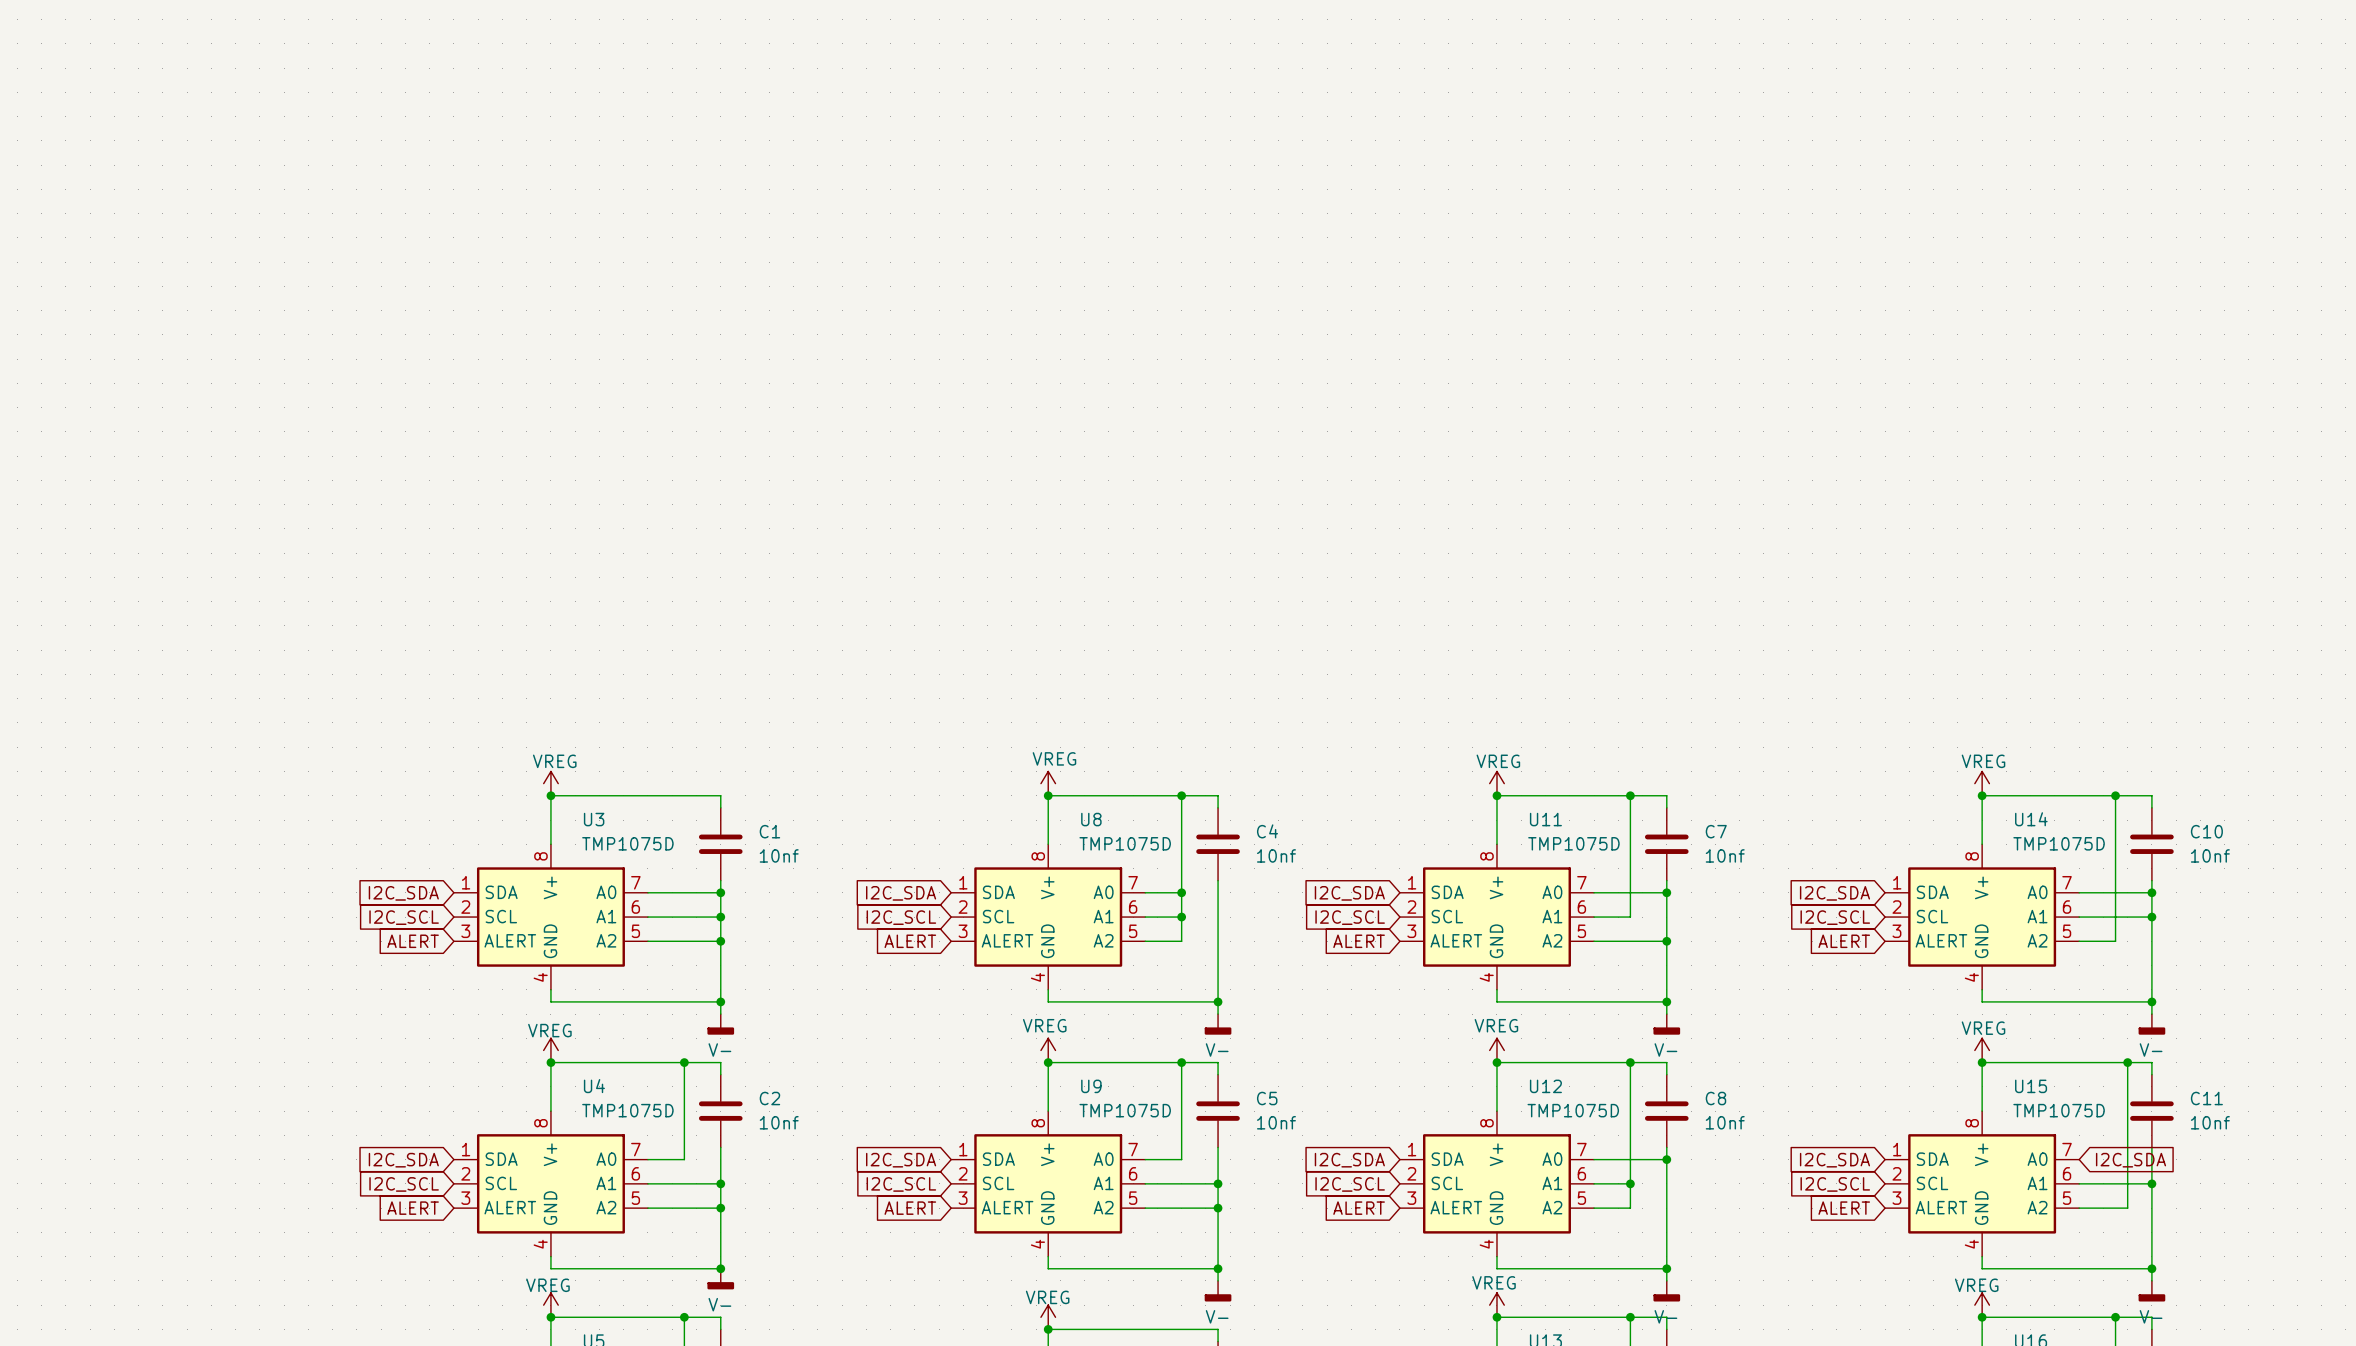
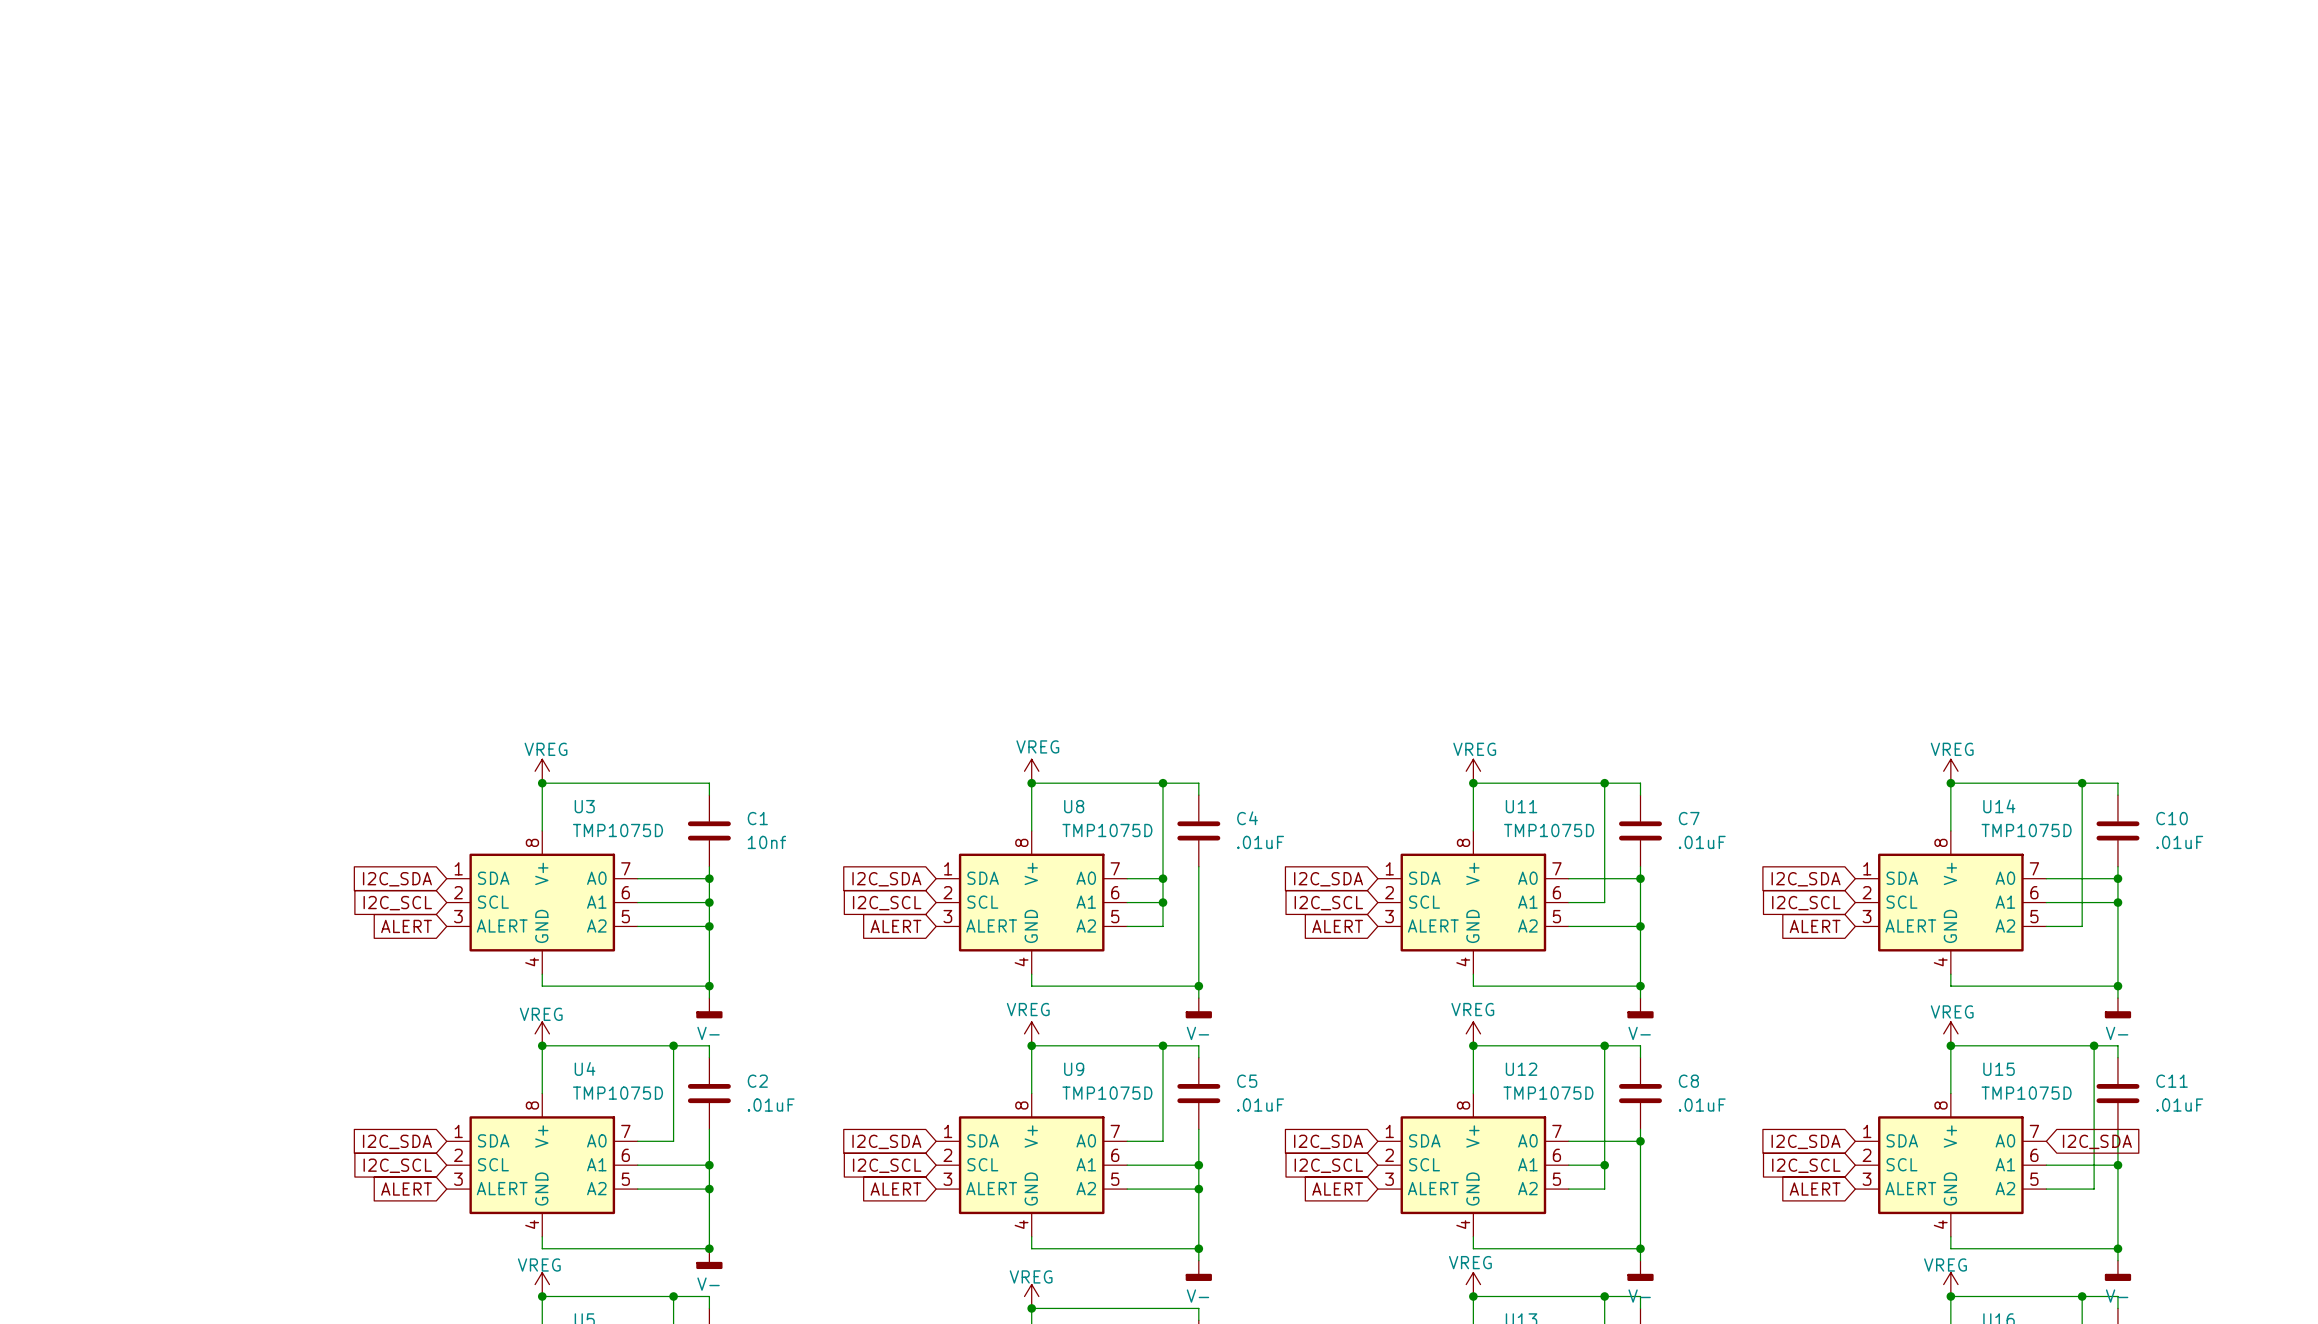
C4 value: 10nf (1276, 855) -> .01uF (1260, 842)
C7 value: 10nf (1725, 855) -> .01uF (1702, 842)
C10 value: 10nf (2210, 855) -> .01uF (2179, 842)
C2 value: 10nf (779, 1122) -> .01uF (771, 1105)
C5 value: 10nf (1276, 1122) -> .01uF (1260, 1105)
C8 value: 10nf (1725, 1122) -> .01uF (1702, 1105)
C11 value: 10nf (2210, 1122) -> .01uF (2179, 1105)

